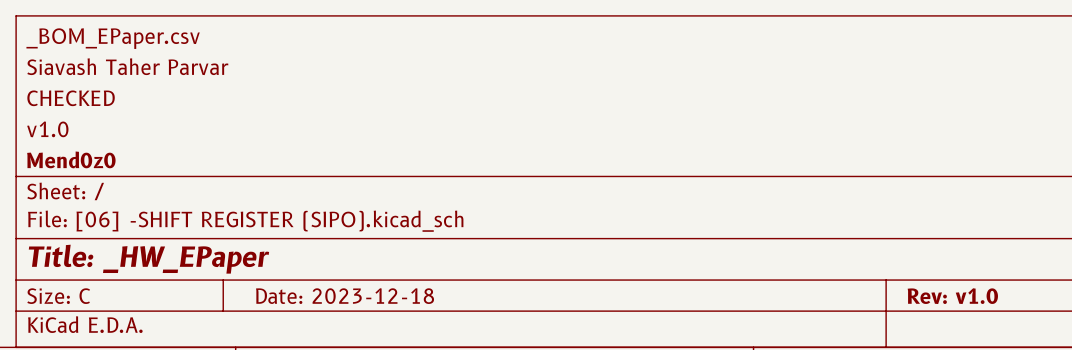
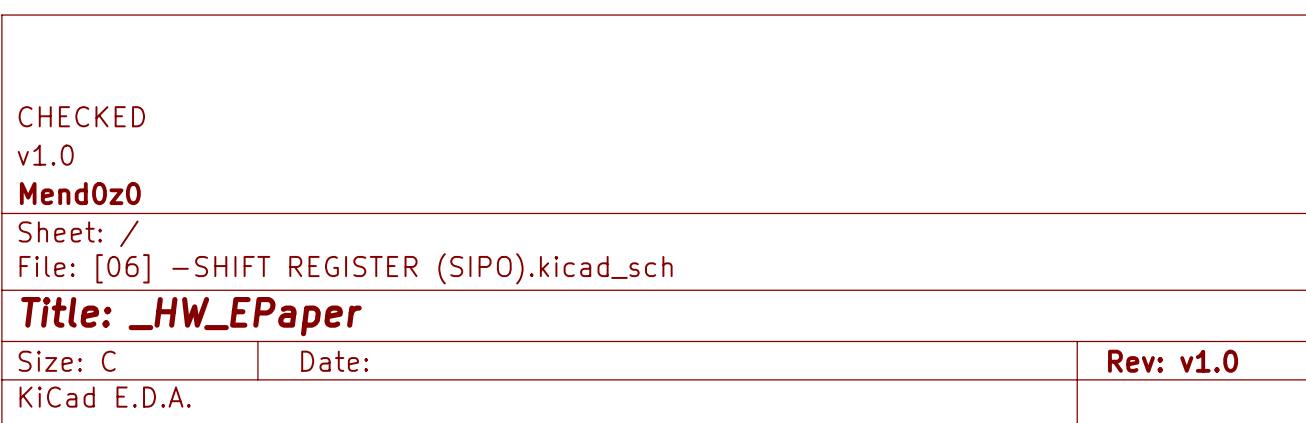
title block: _BOM_EPaper.csv (113, 38) -> none
title block: Siavash Taher Parvar (127, 66) -> none
title block: Date: 2023-12-18 (345, 296) -> Date: (334, 361)

